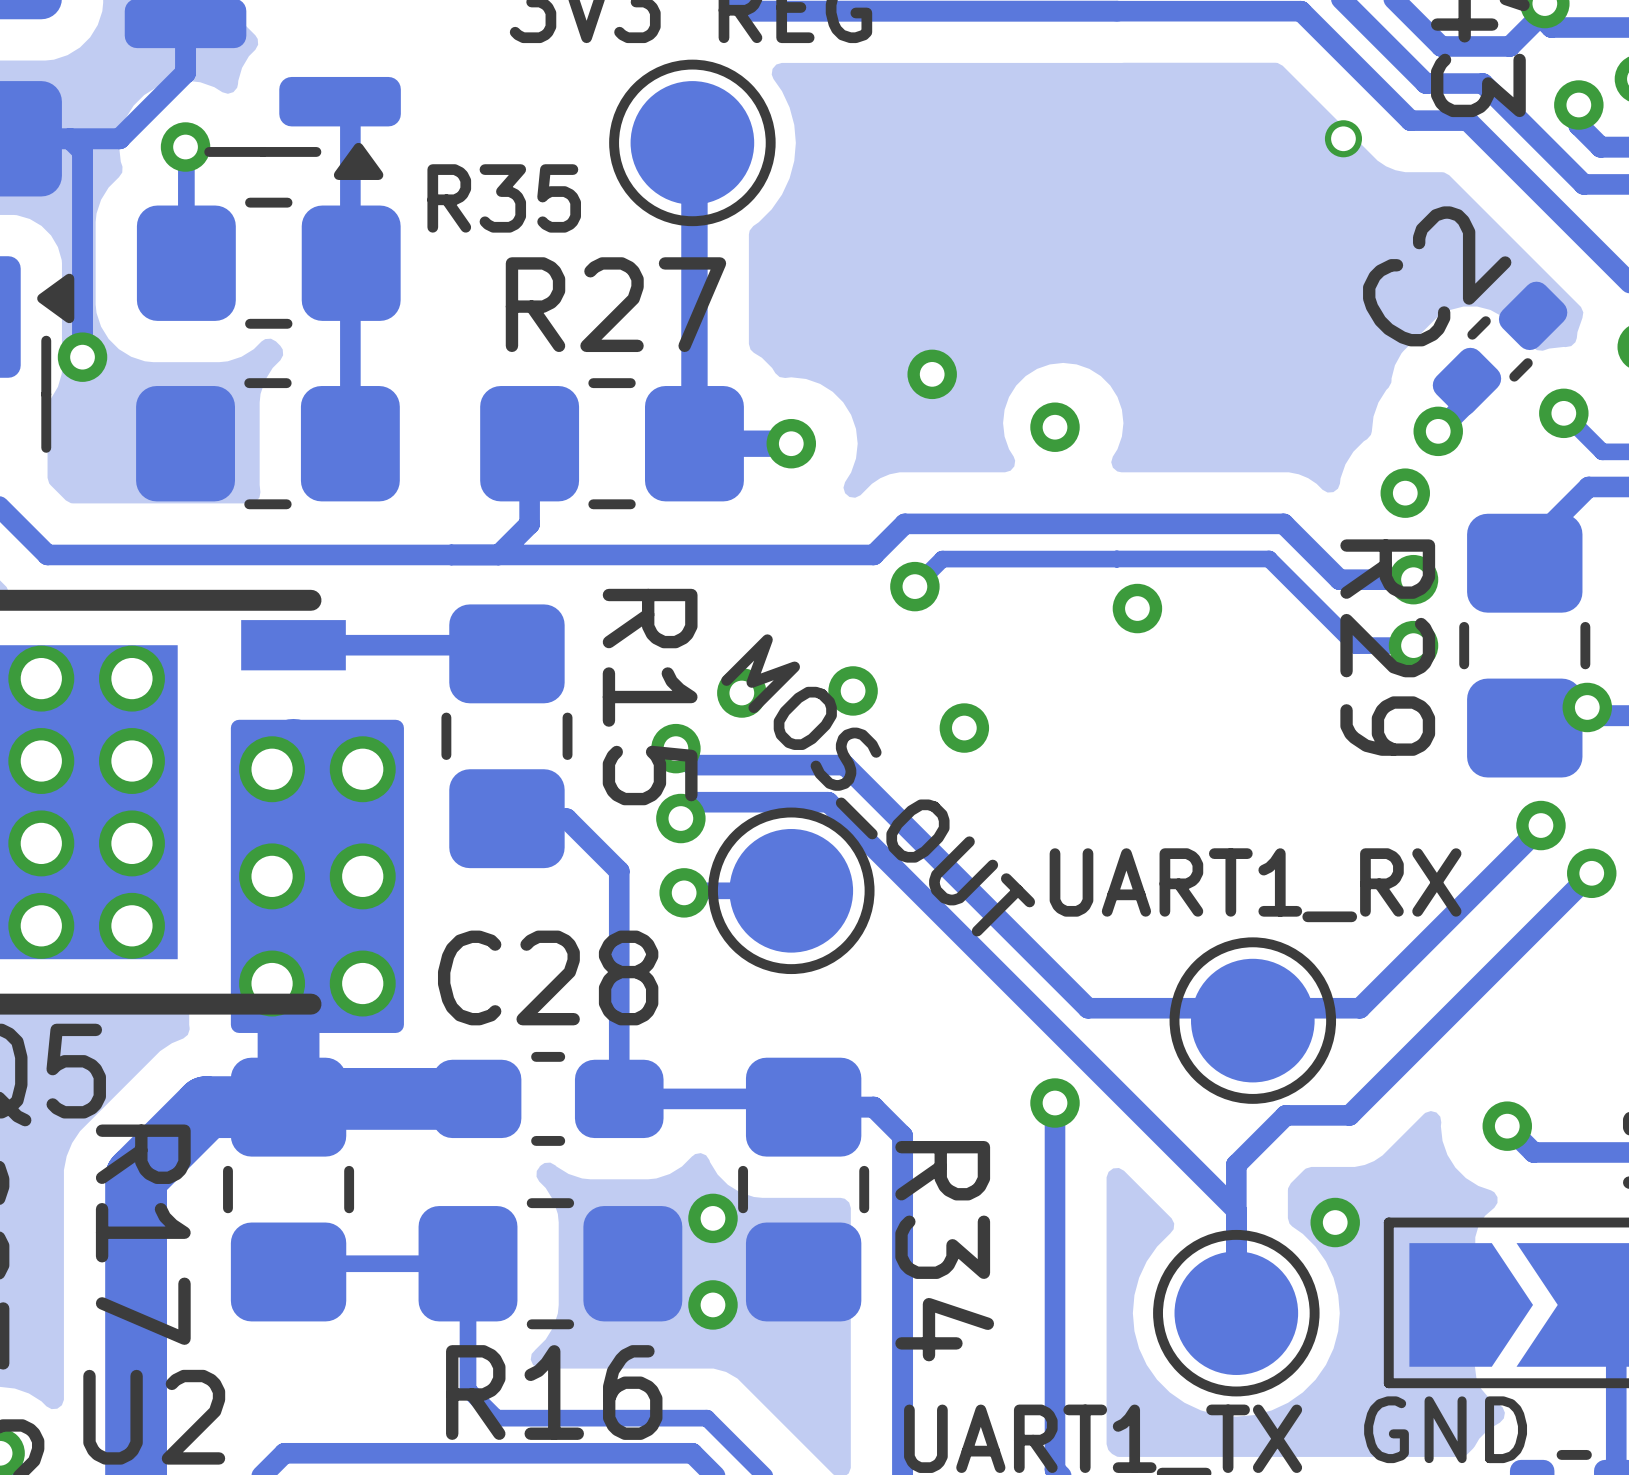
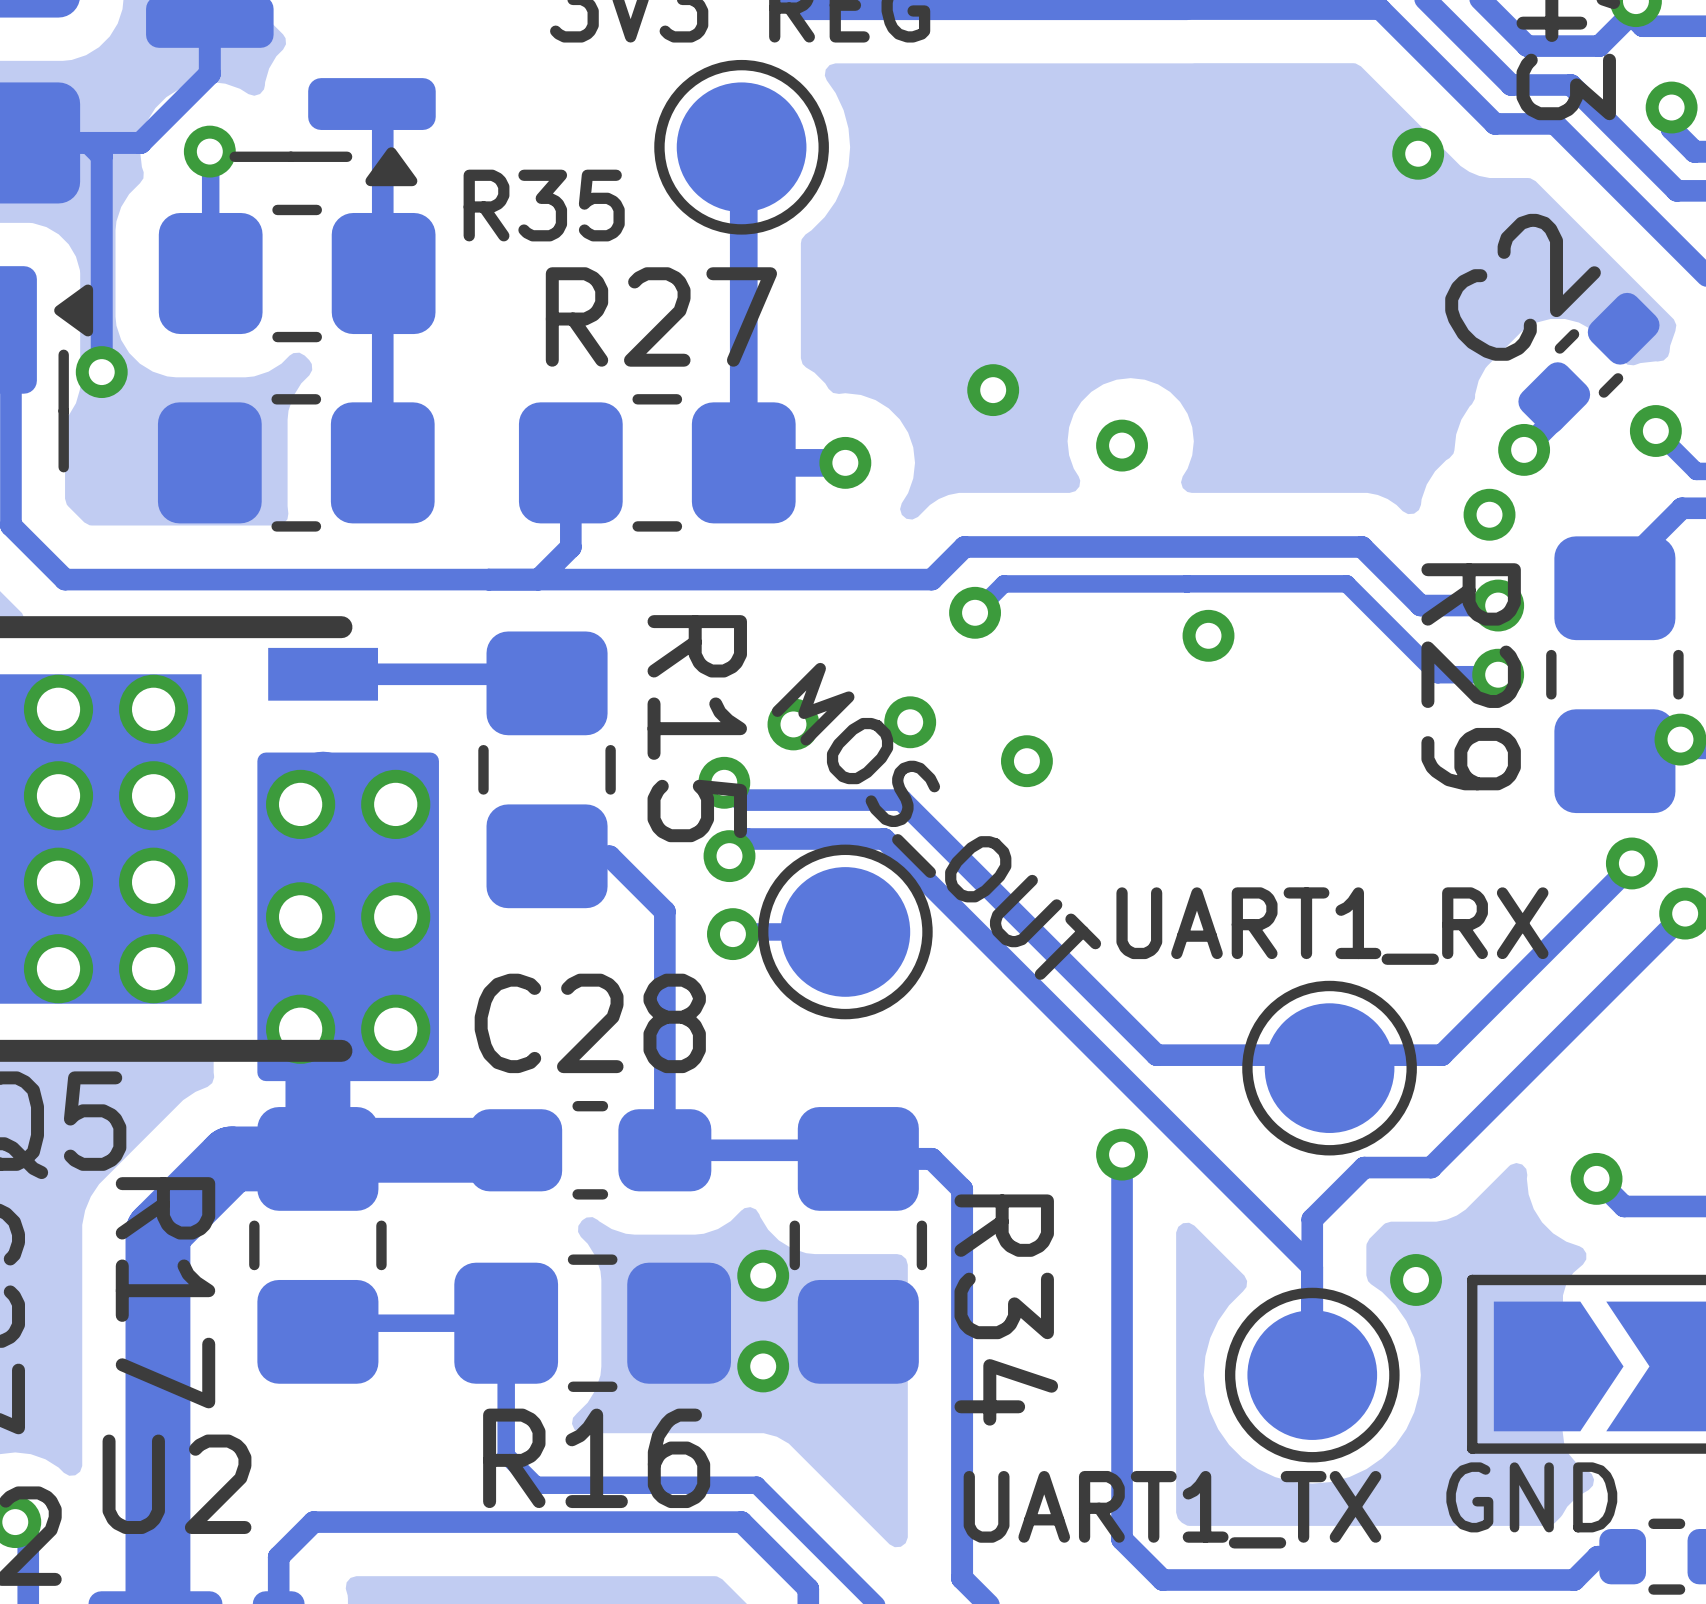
via size: [1324, 120, 1363, 158] -> [1392, 127, 1445, 180]

